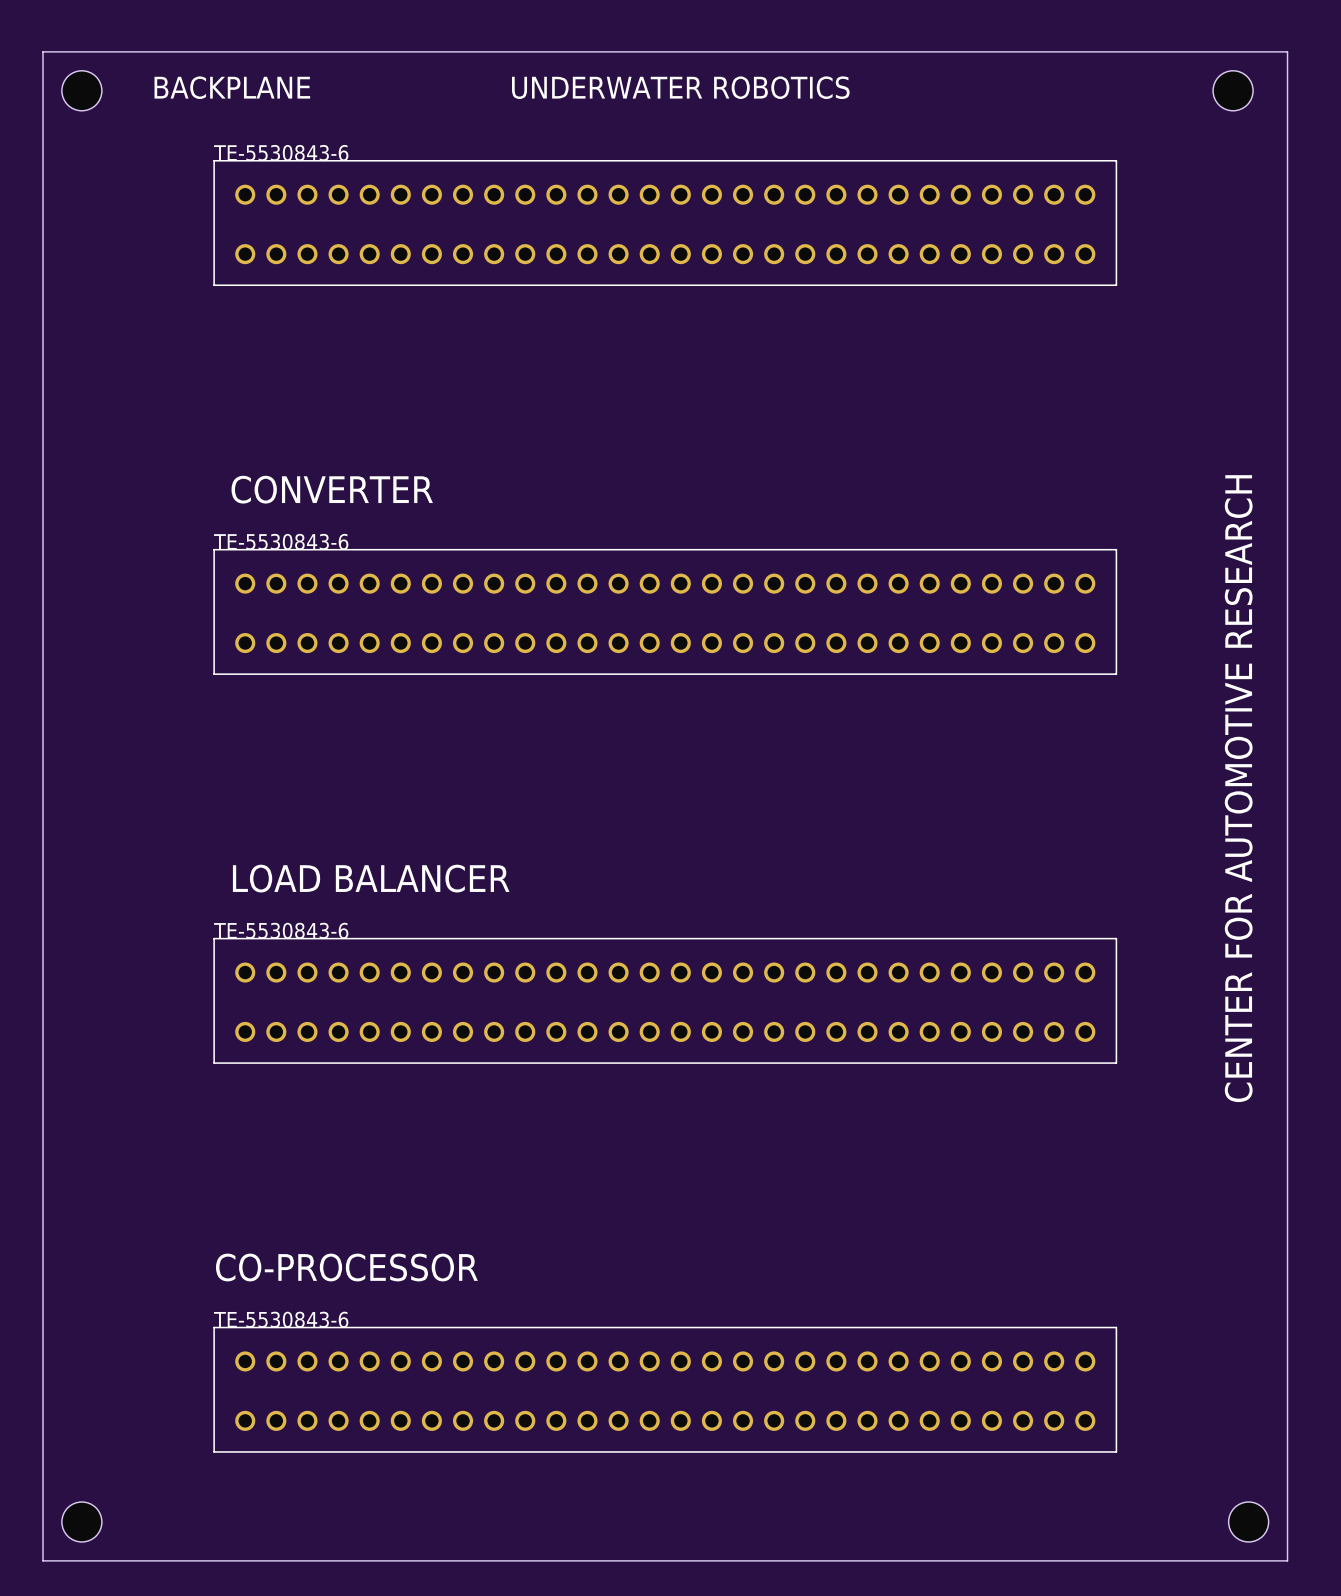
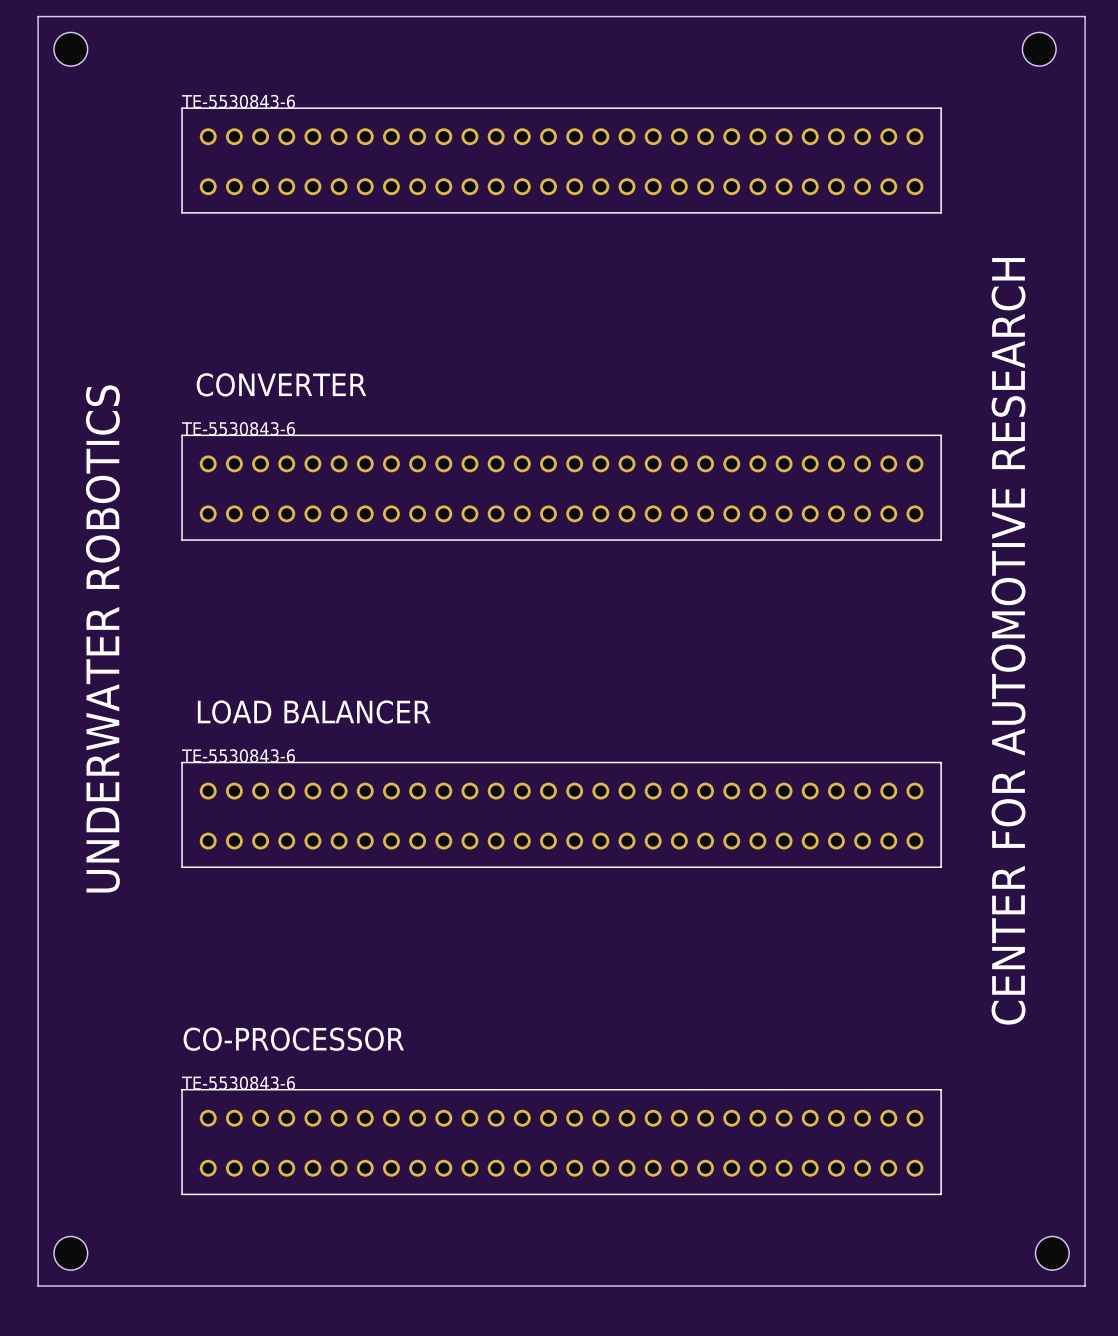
text: BACKPLANE (232, 87) -> none
text: UNDERWATER ROBOTICS (680, 87) -> none
text: CENTER FOR AUTOMOTIVE RESEARCH (1238, 788) -> none
text: none -> UNDERWATER ROBOTICS (102, 638)
text: none -> CENTER FOR AUTOMOTIVE RESEARCH (1008, 641)

